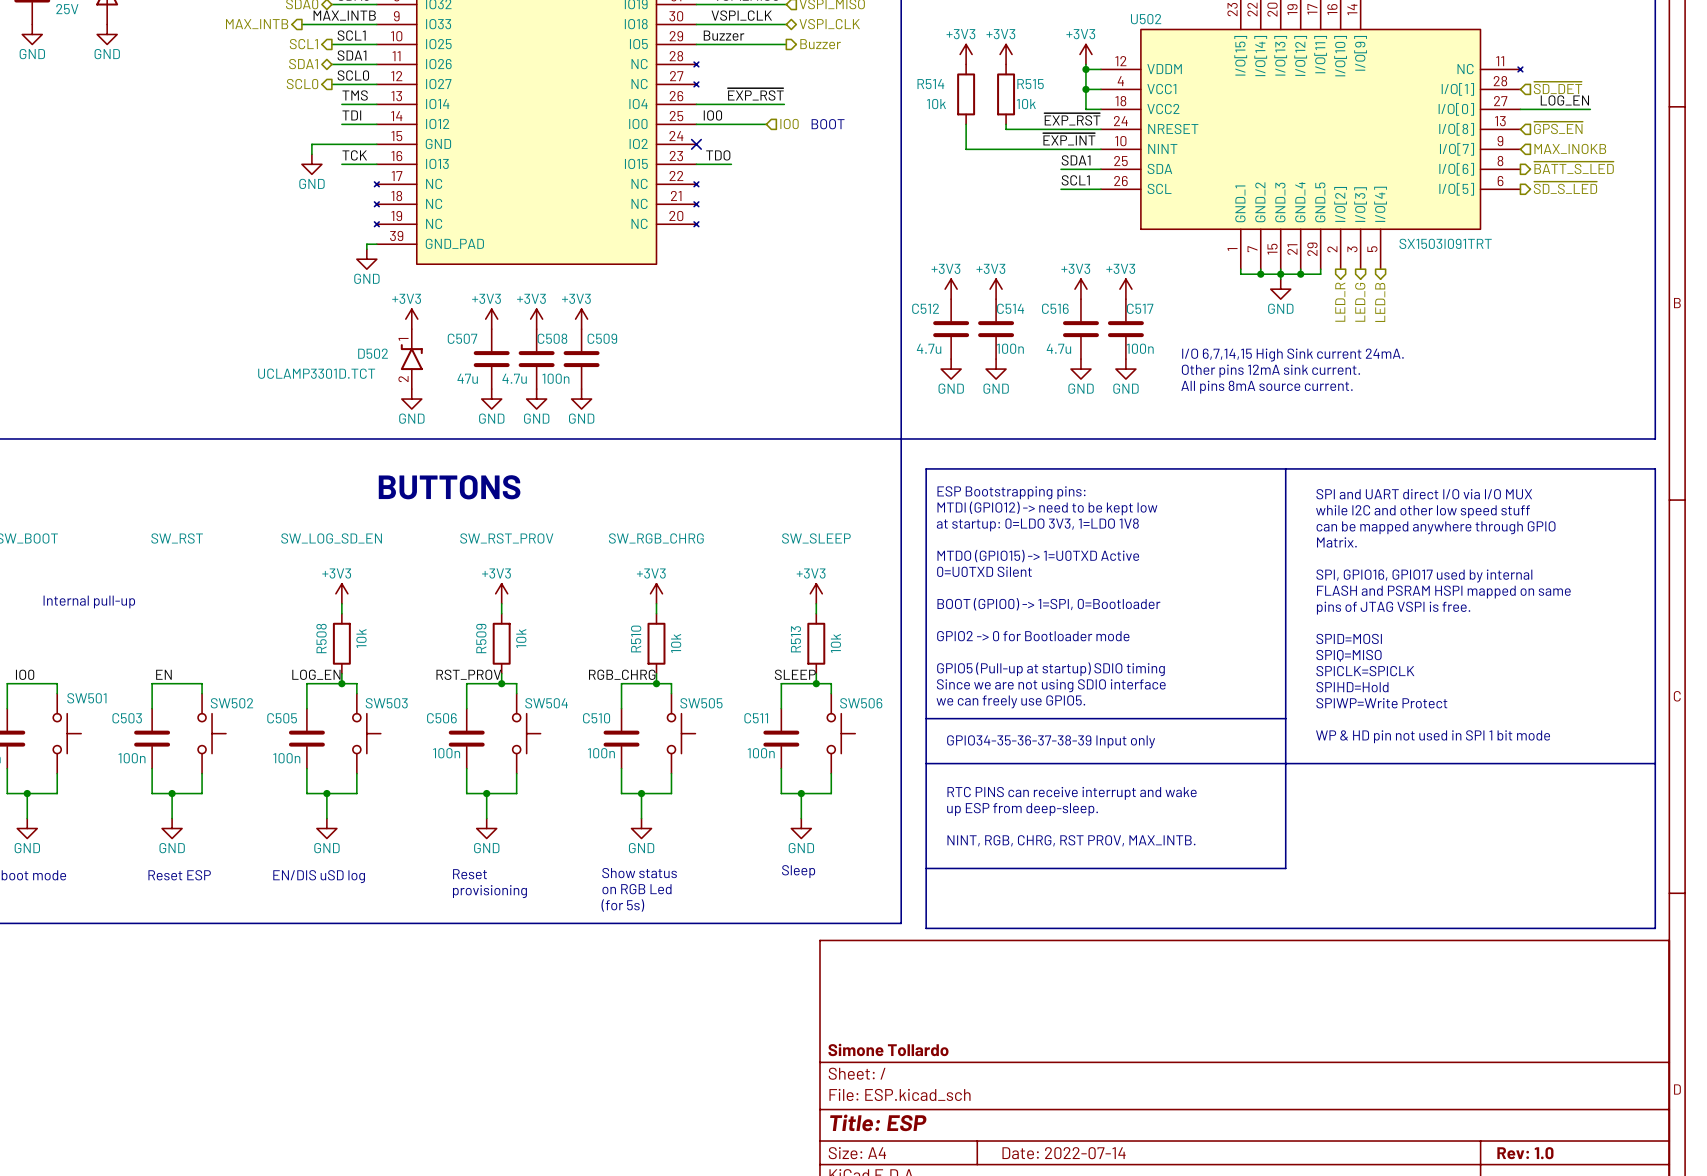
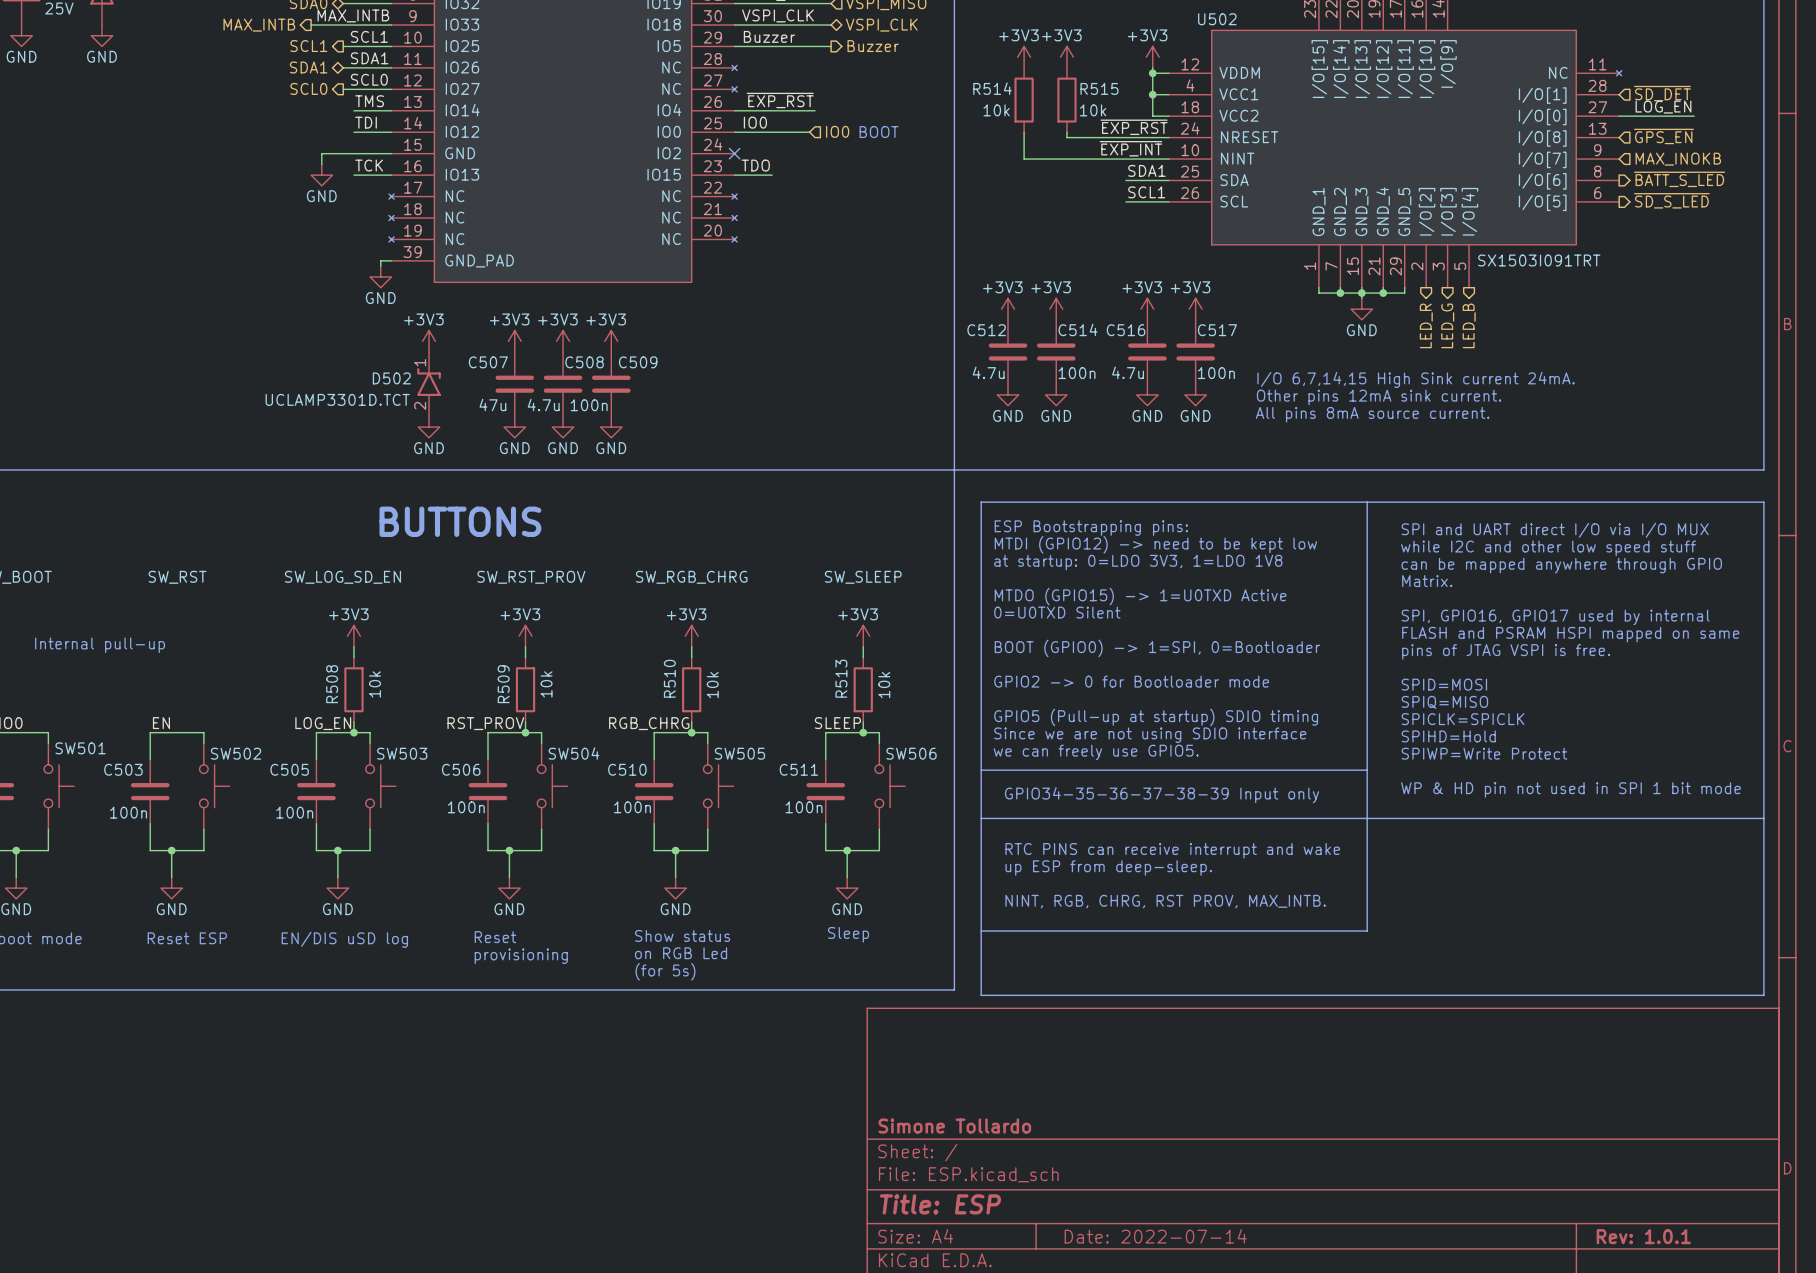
label position: ~{EXP_RST} (755, 94) -> ~{EXP_RST} (780, 100)
wire: (771, 104) (784, 104) -> none
title block: Rev: 1.0 (1525, 1153) -> Rev: 1.0.1 (1643, 1236)

